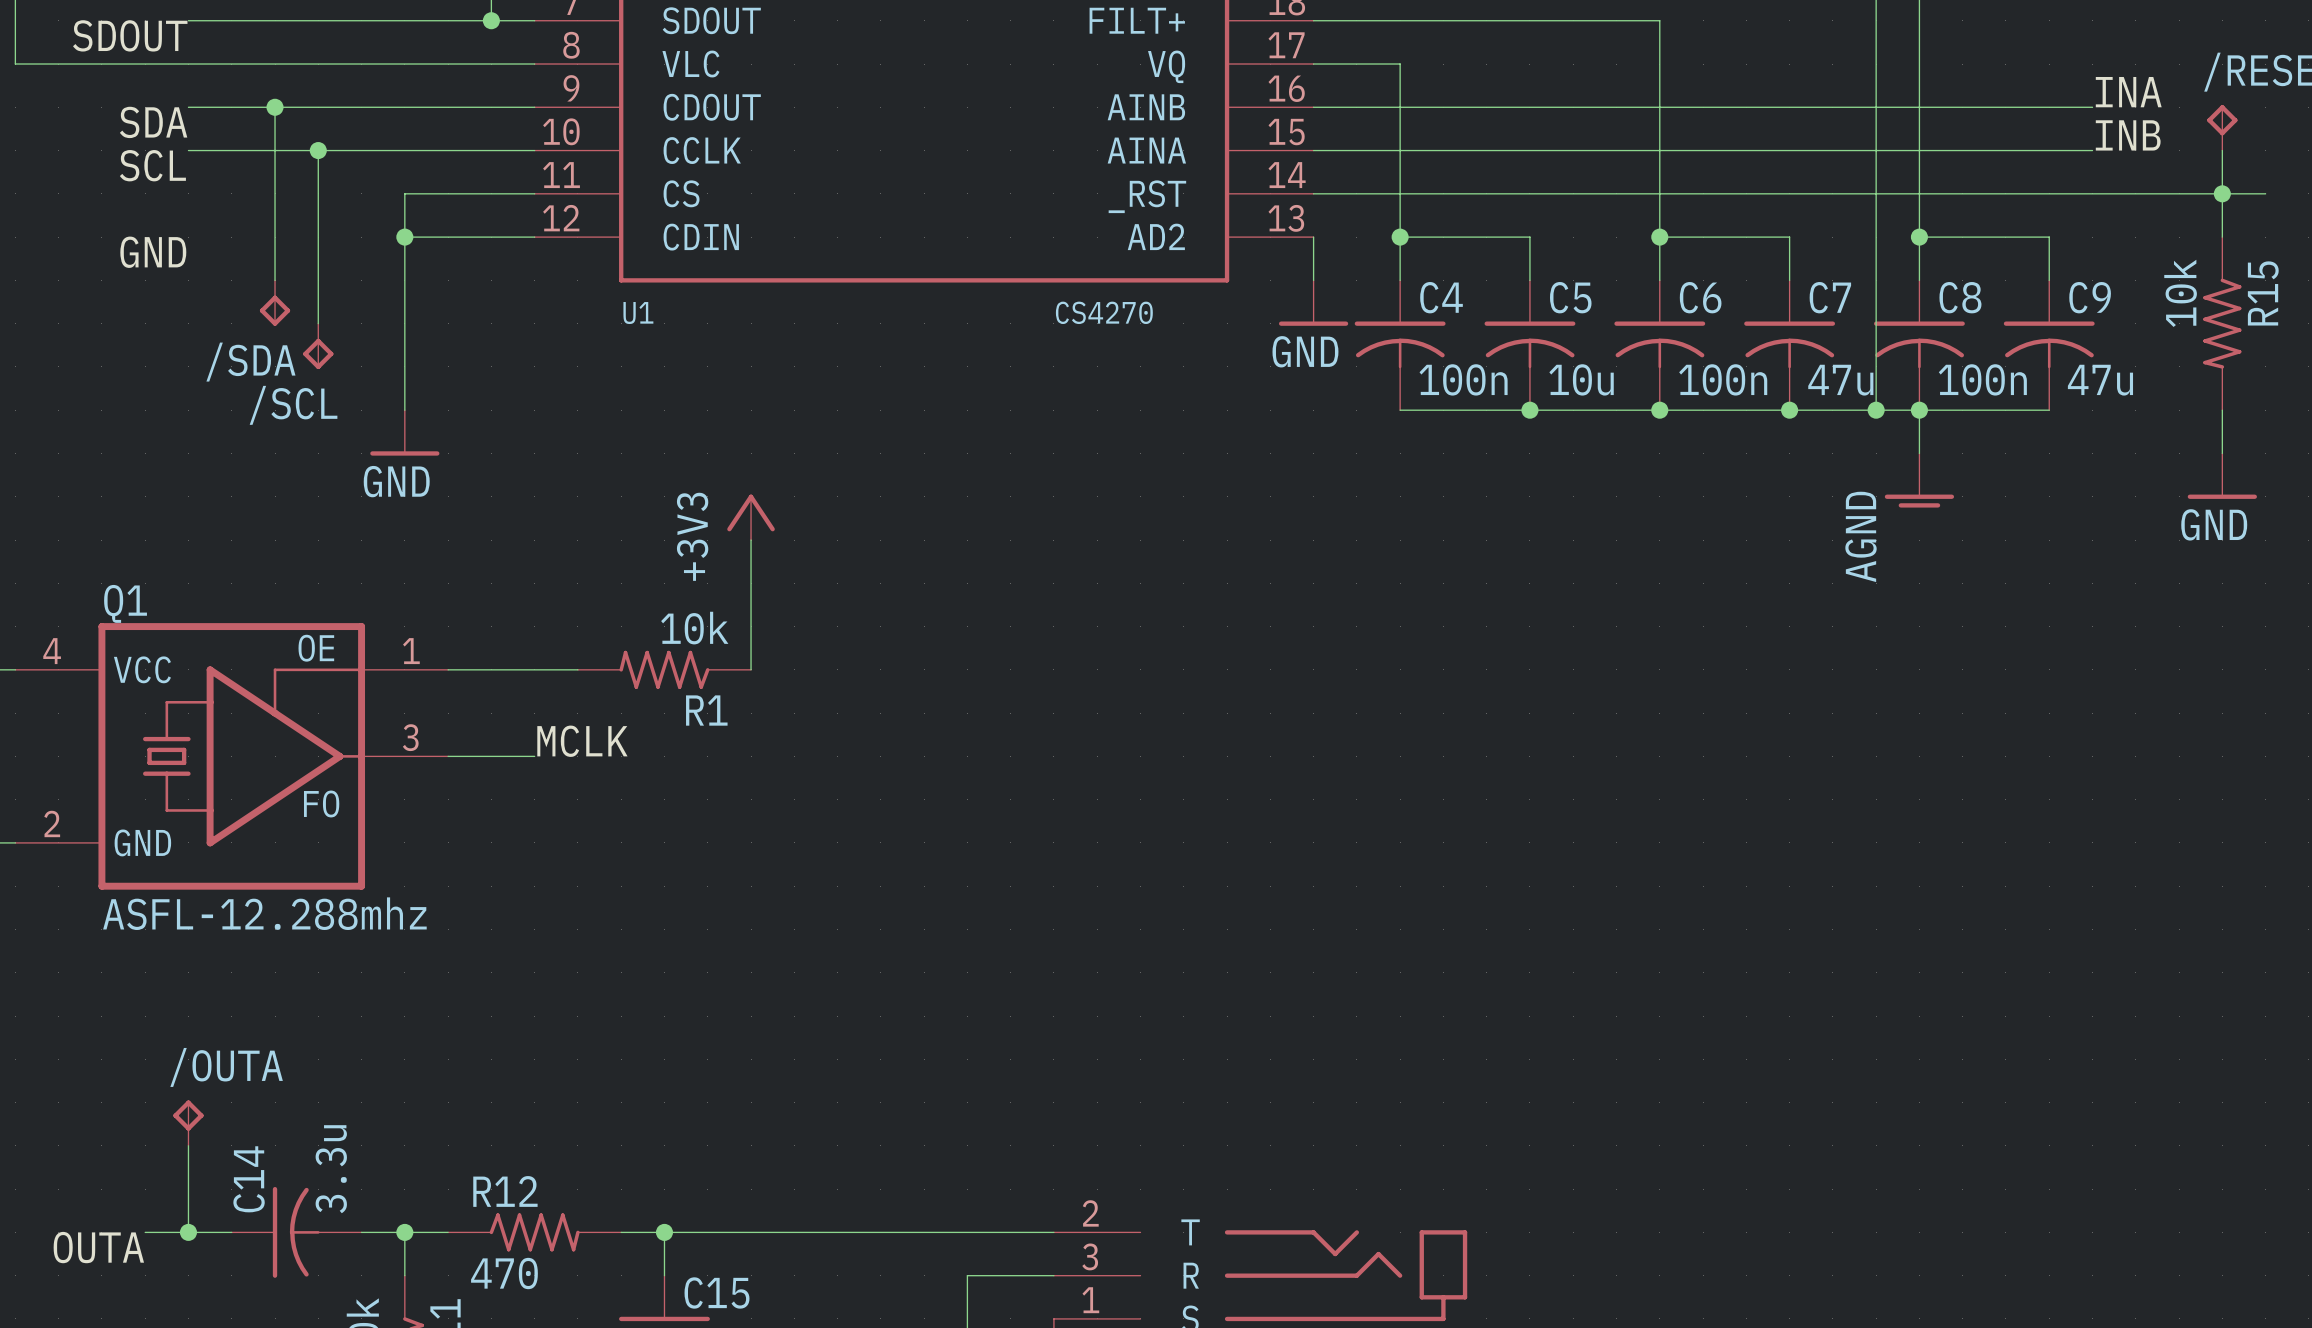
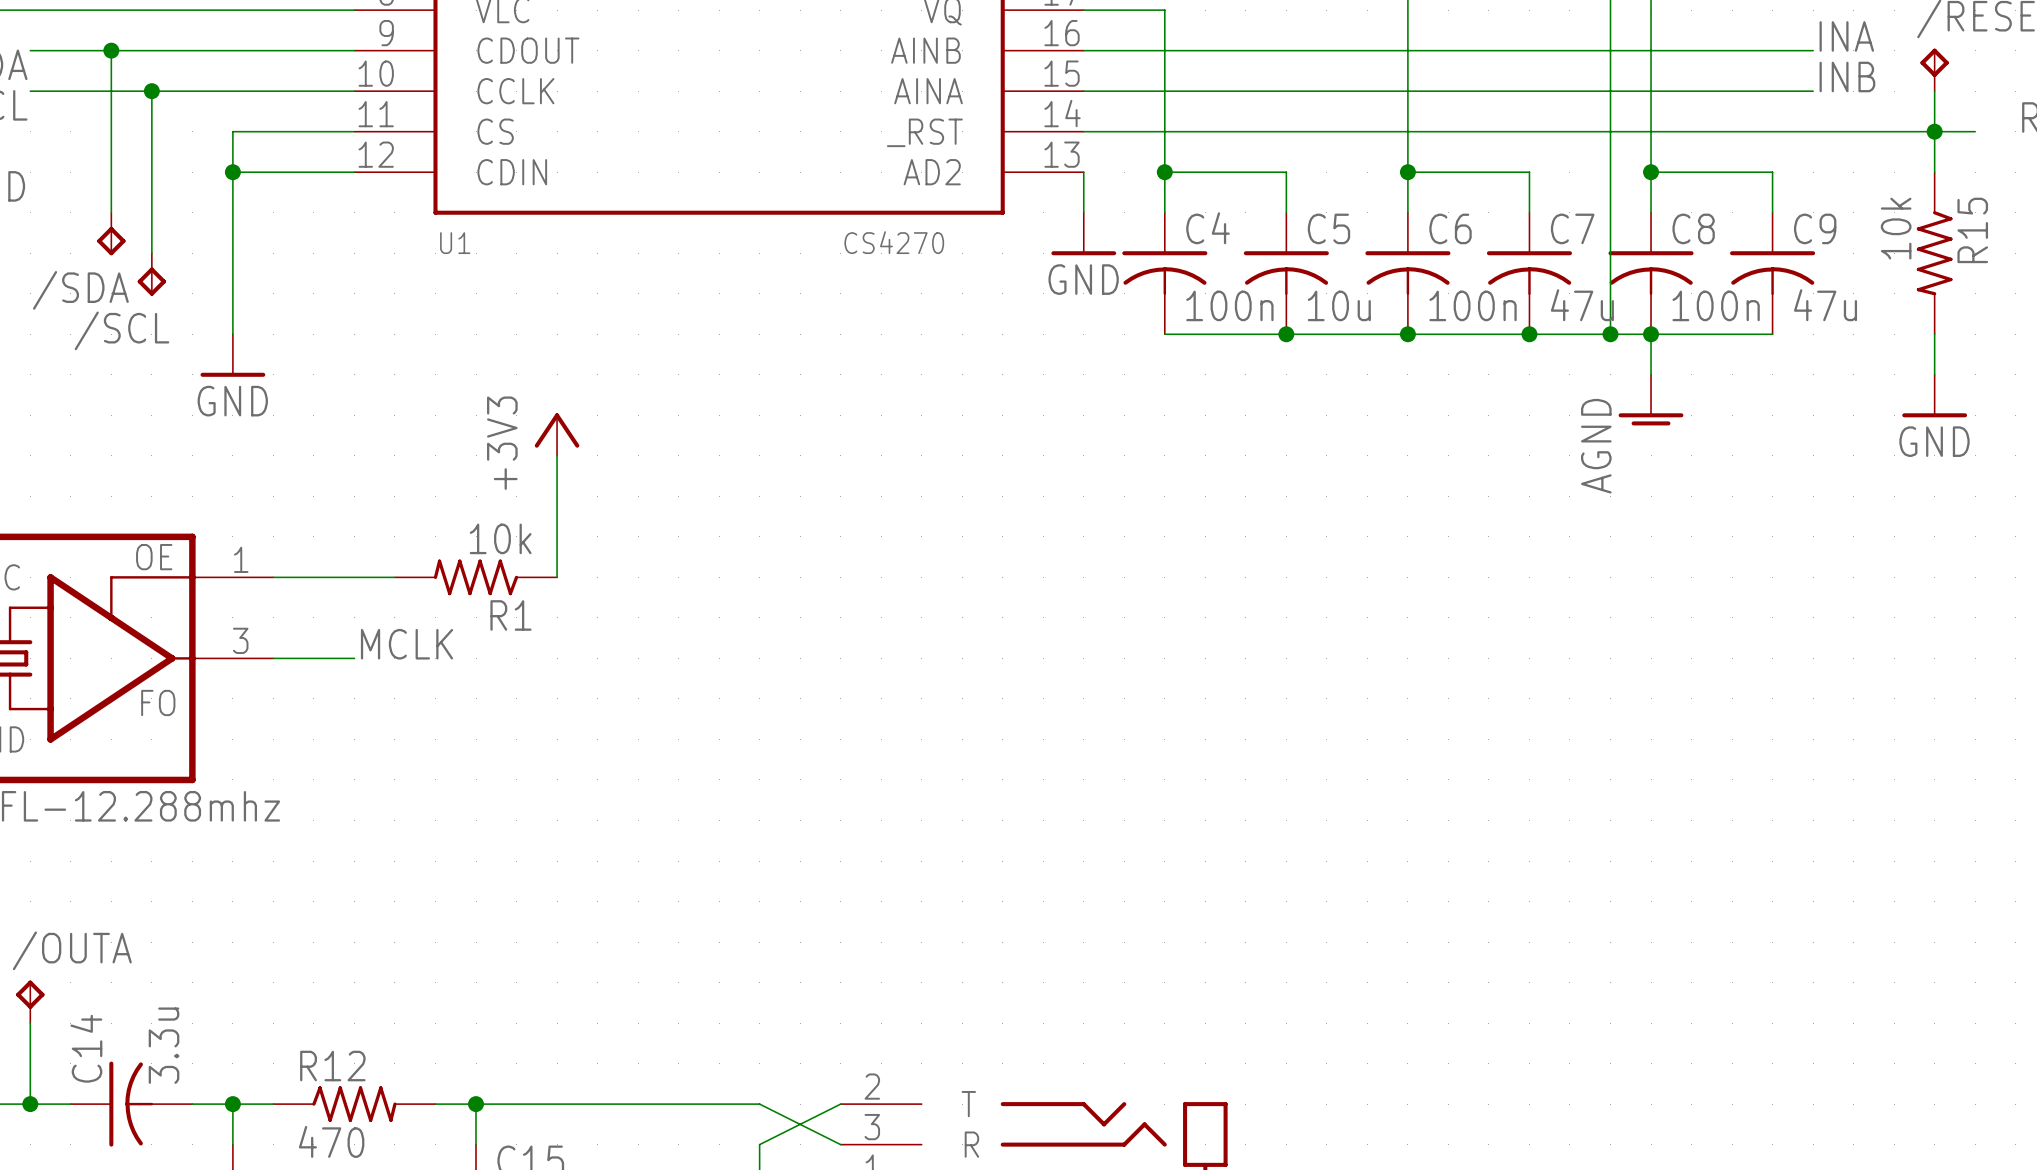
wire: (967, 1232) (1053, 1232) -> (759, 1104) (840, 1144)
wire: (967, 1275) (1053, 1275) -> (759, 1144) (840, 1104)

